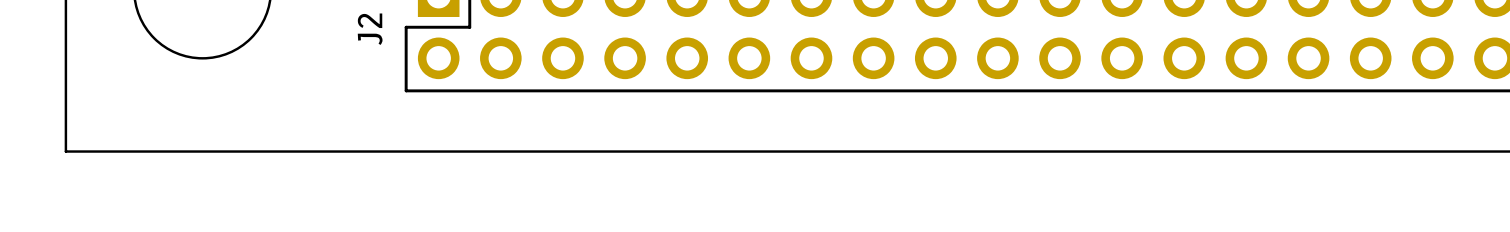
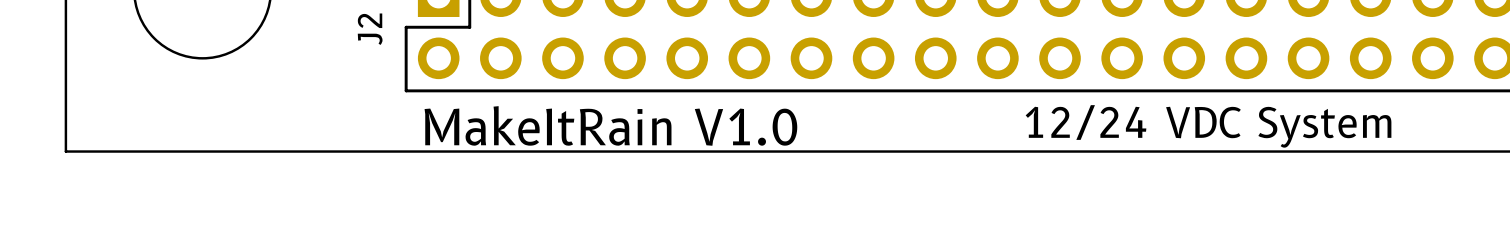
text: none -> MakeItRain V1.0 (610, 125)
text: none -> 12/24 VDC System (1208, 126)

